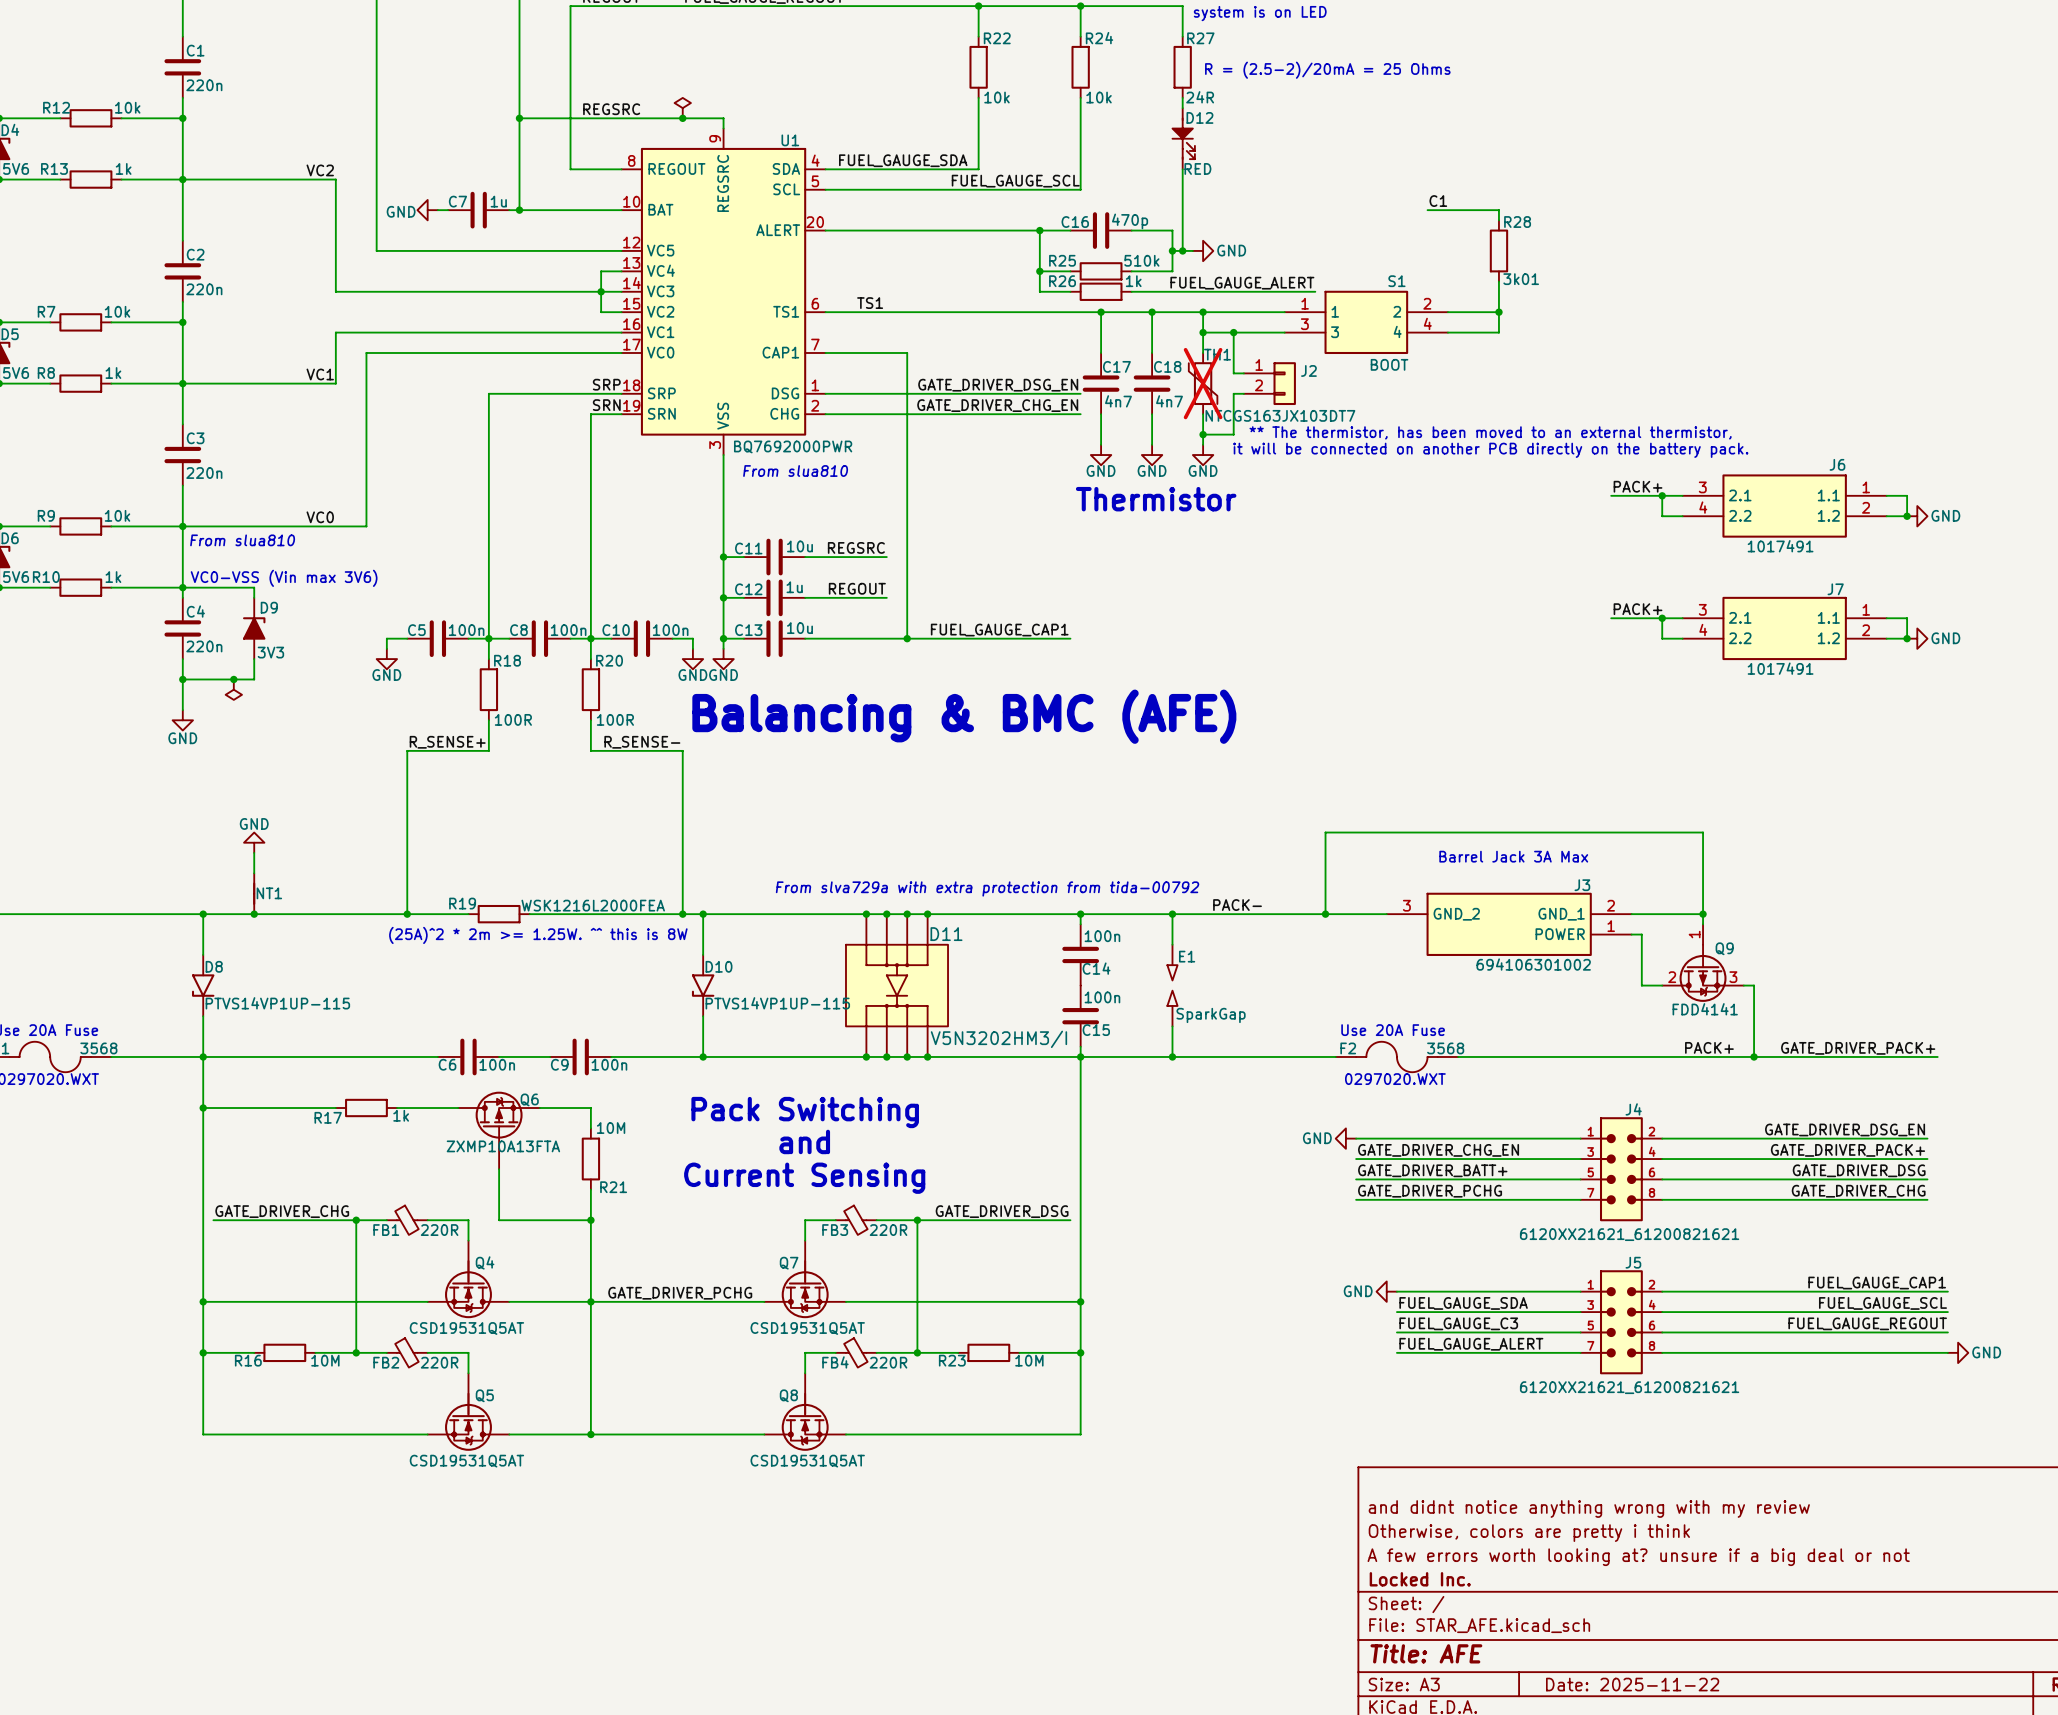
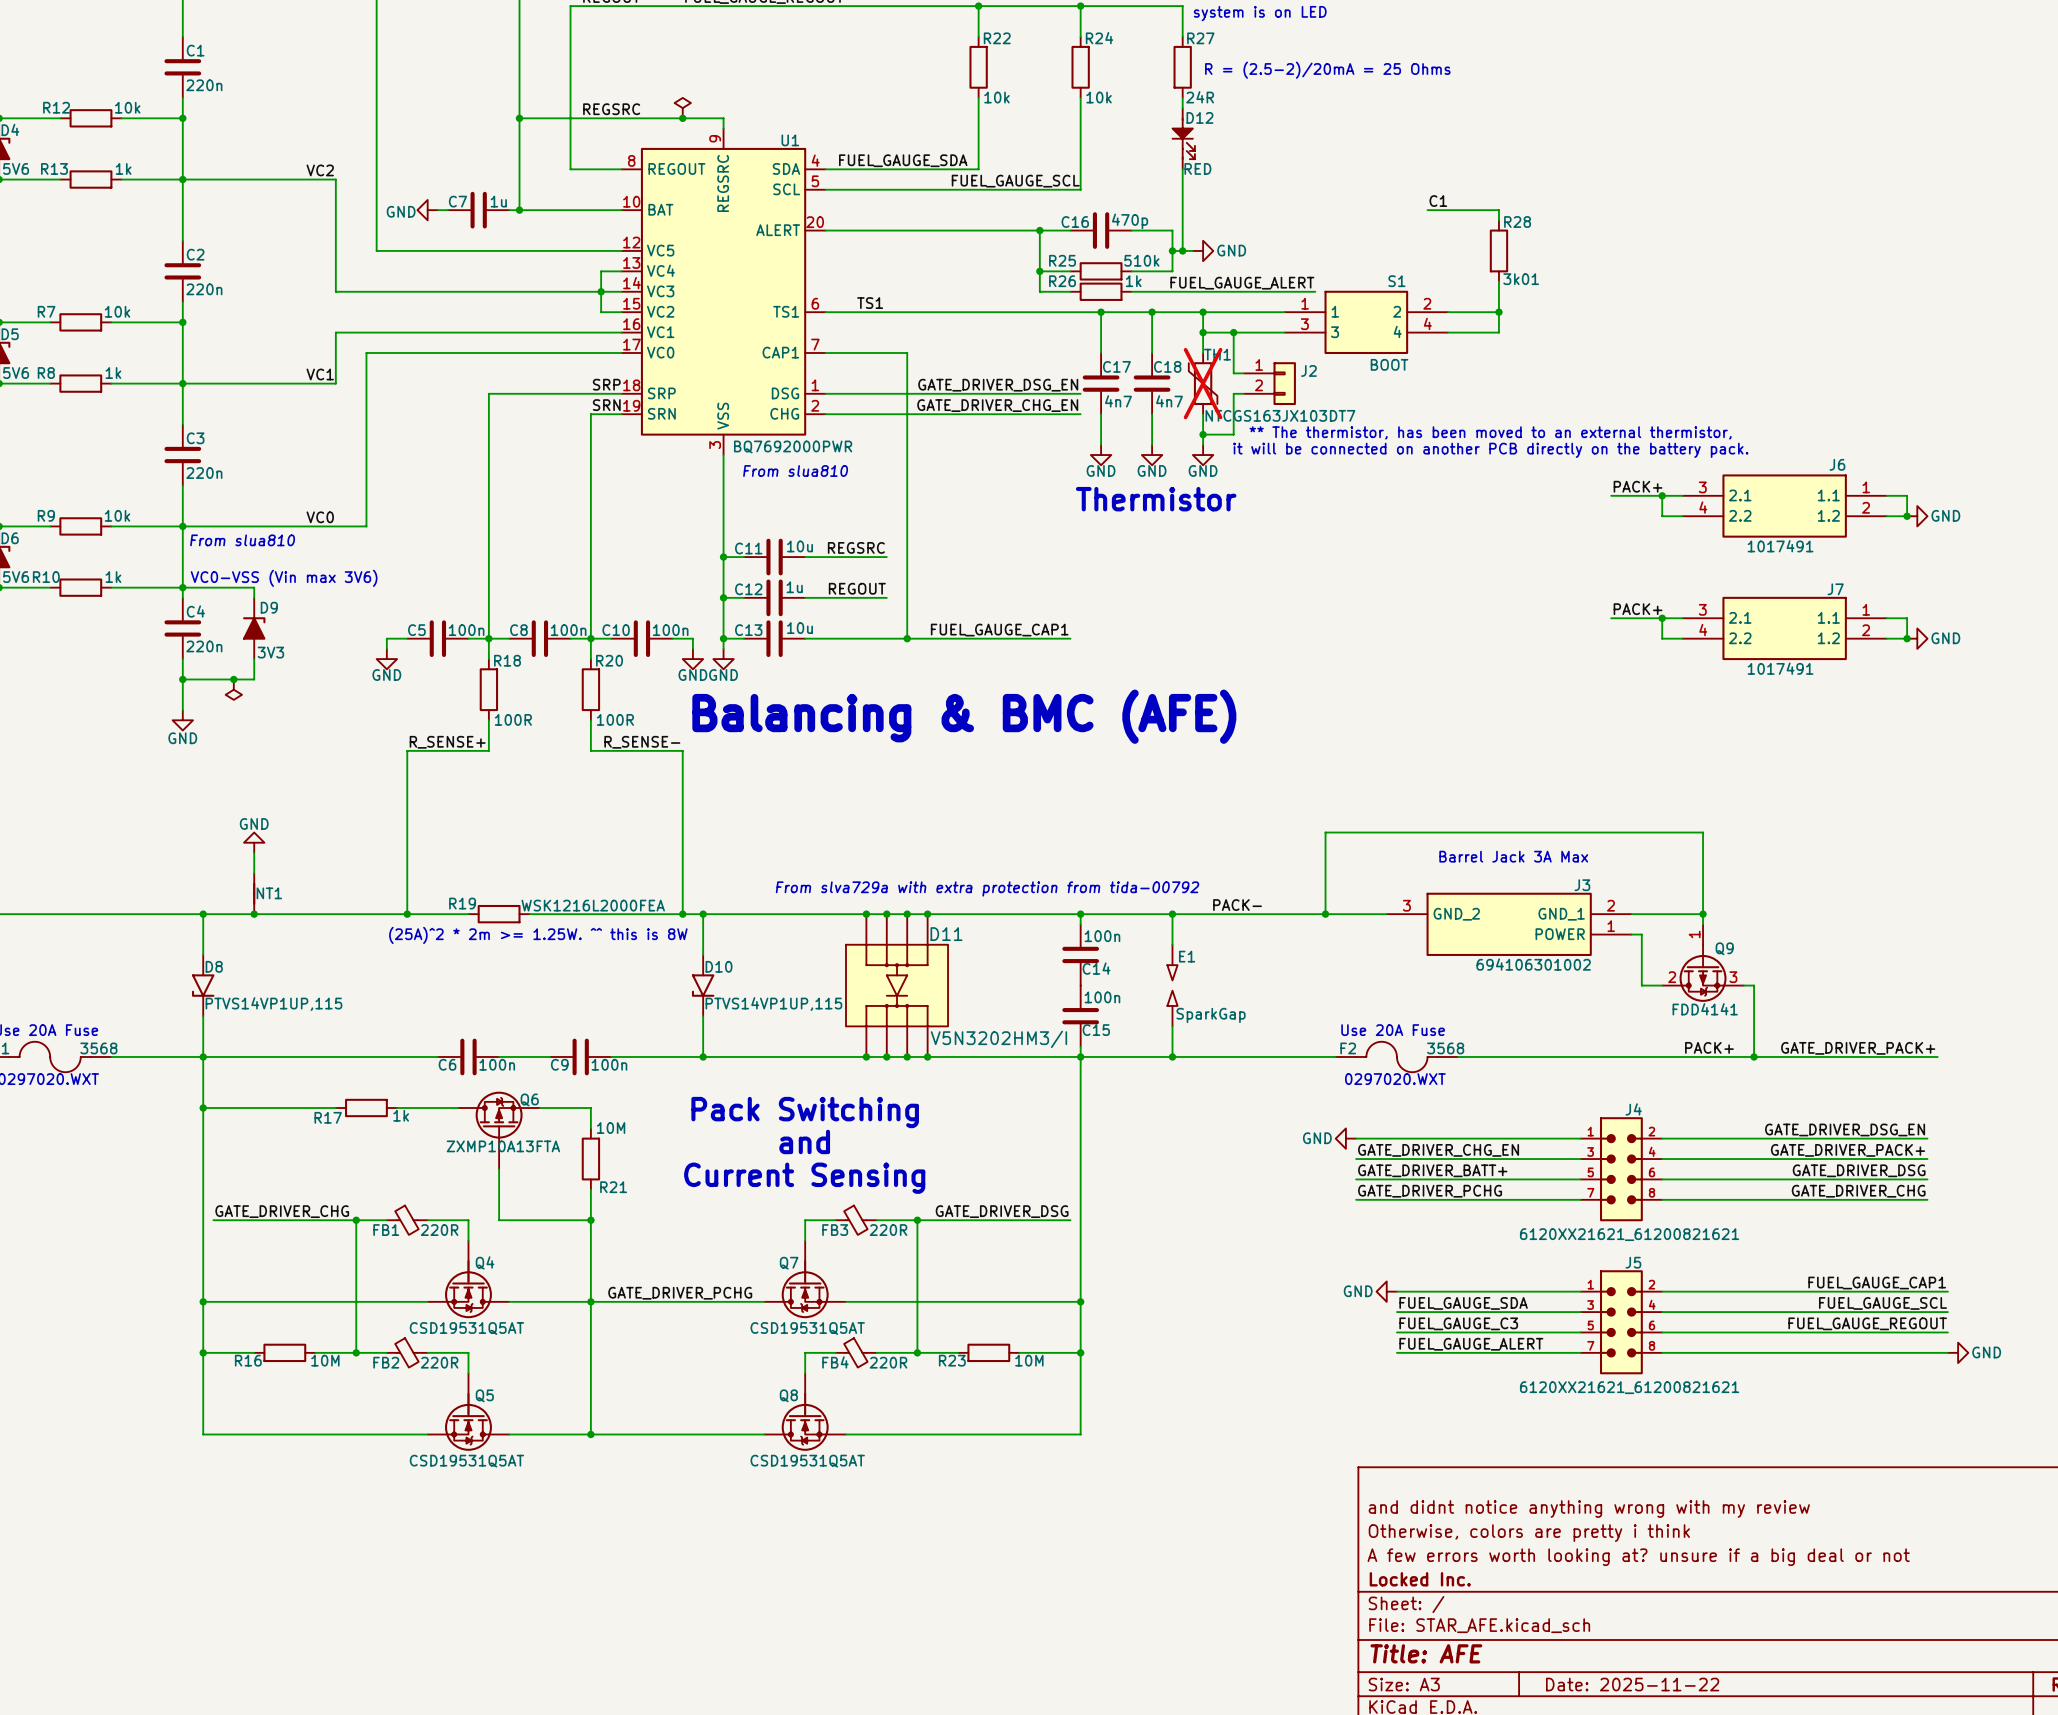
D8 value: PTVS14VP1UP-115 (277, 1003) -> PTVS14VP1UP,115 (273, 1004)
D10 value: PTVS14VP1UP-115 (777, 1003) -> PTVS14VP1UP,115 (773, 1004)

